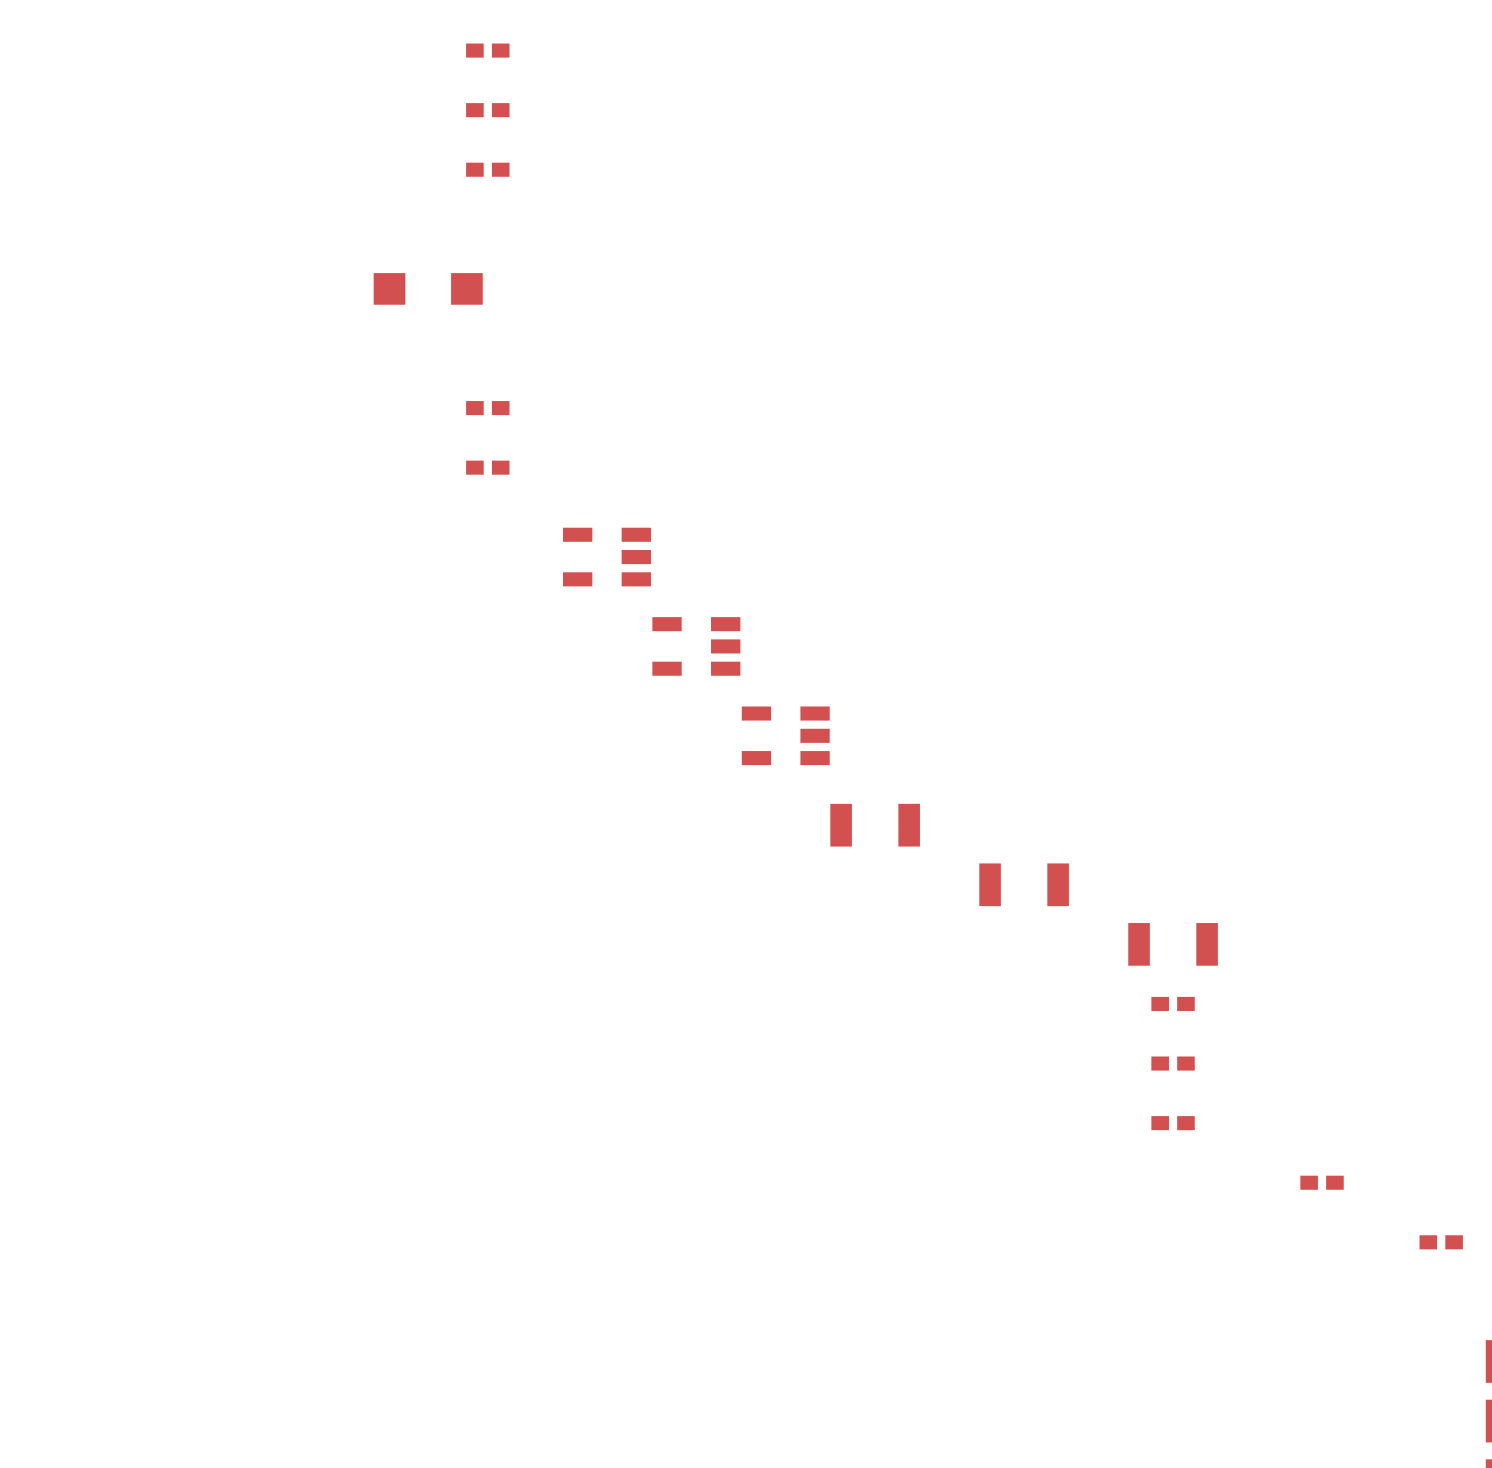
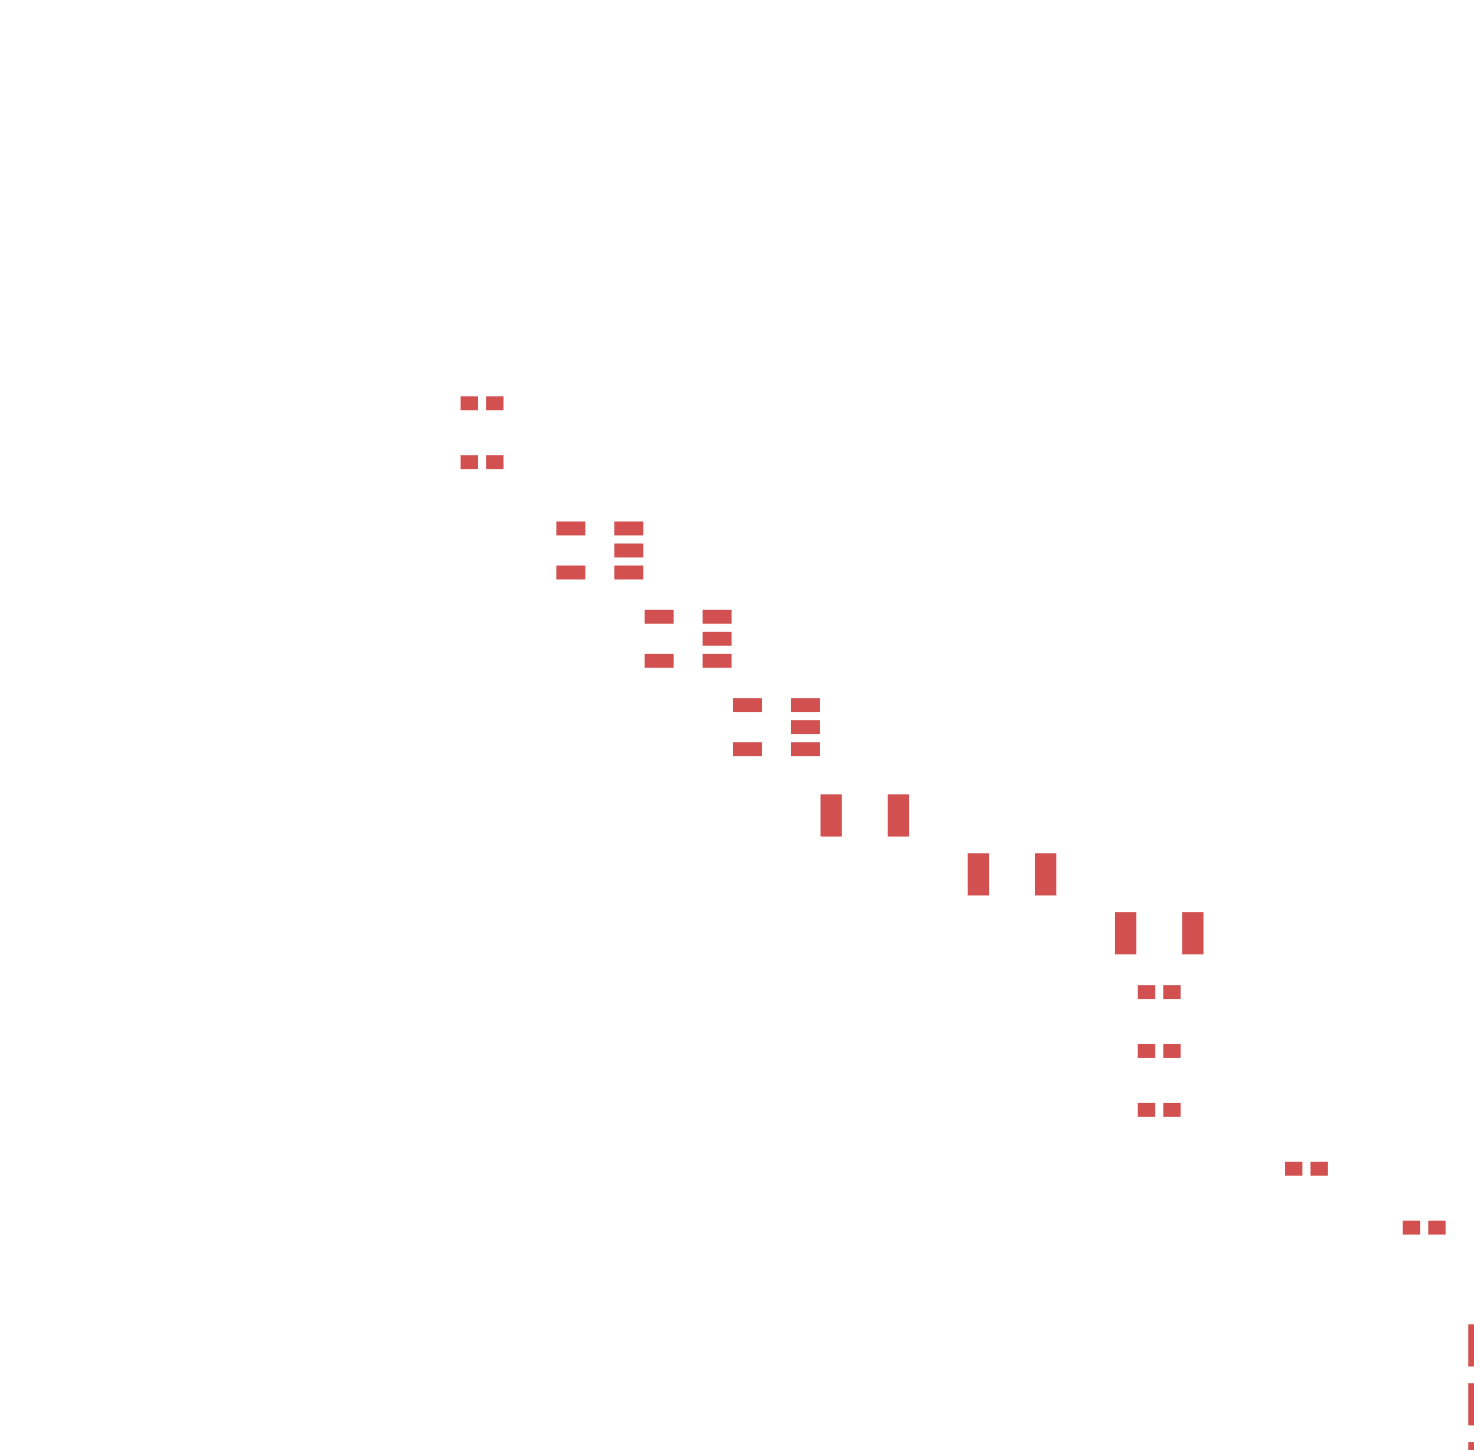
part: (487, 50) -> none
part: (487, 110) -> none
part: (487, 169) -> none
part: (428, 288) -> none

